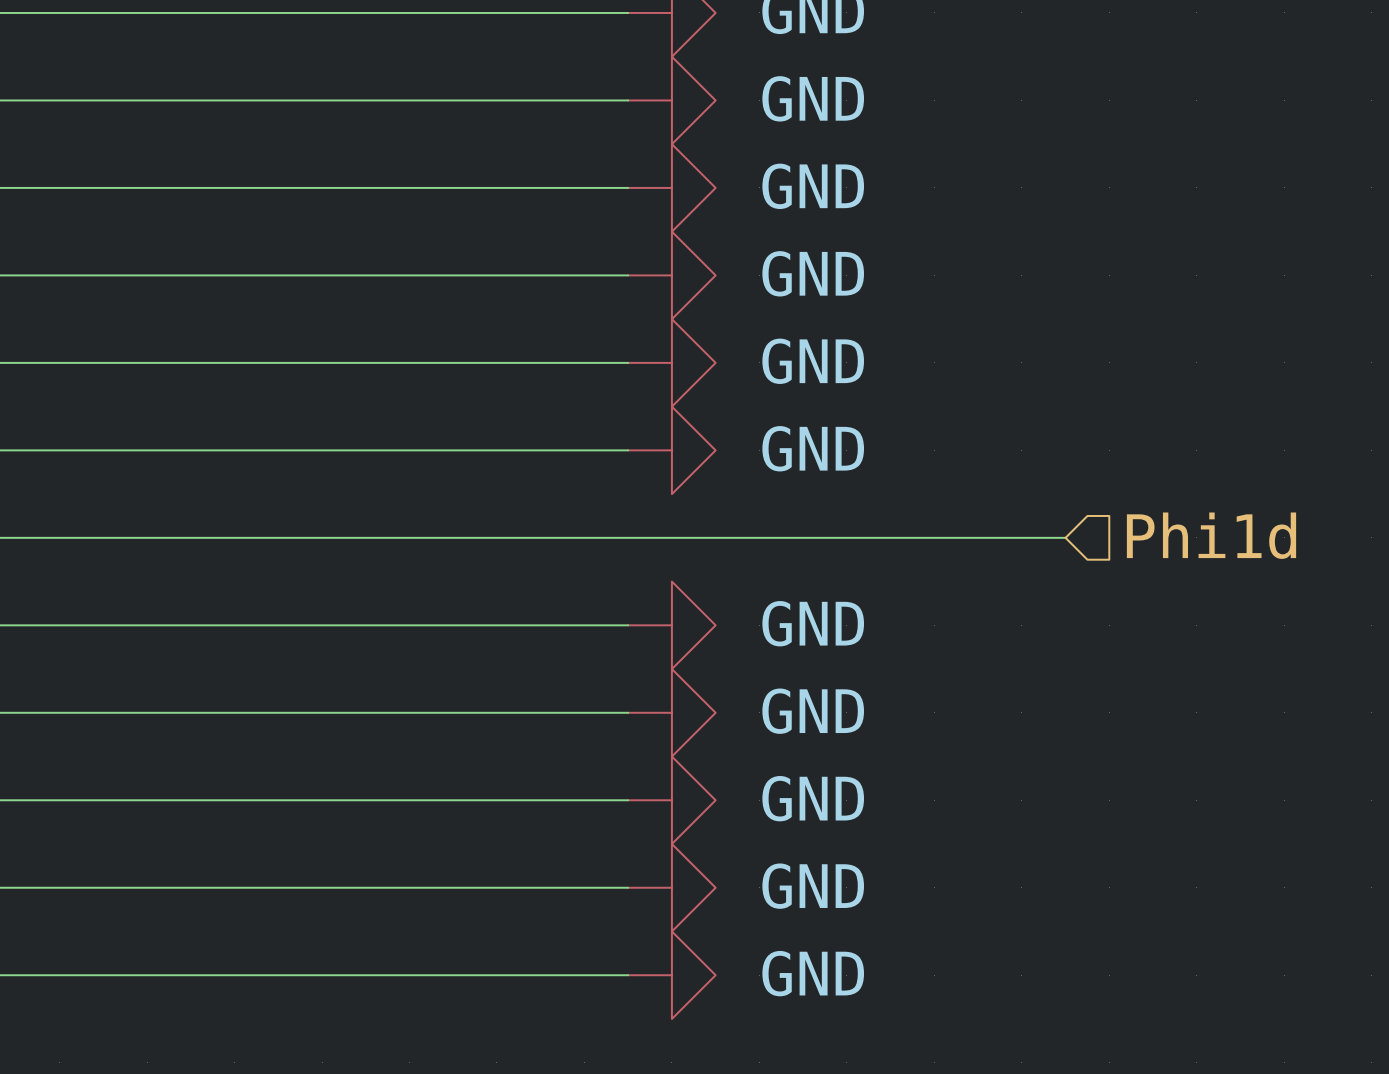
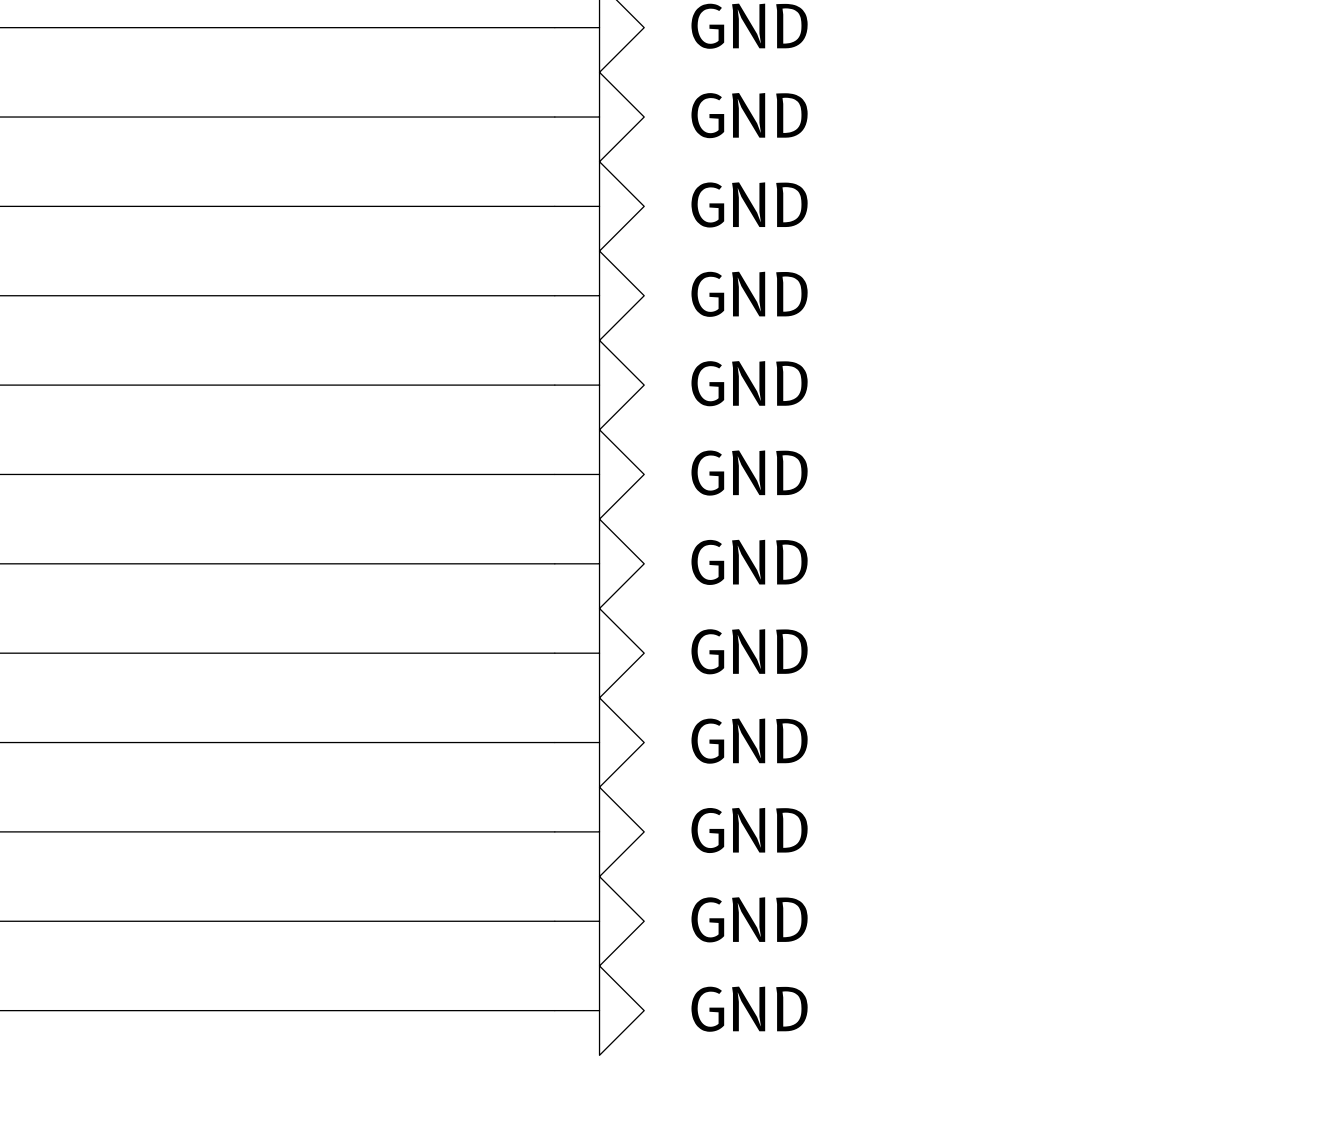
hierarchical label: Phi1d (1211, 535) -> none
wire: (628, 537) (1065, 537) -> none
power symbol: none -> GND (599, 563)

